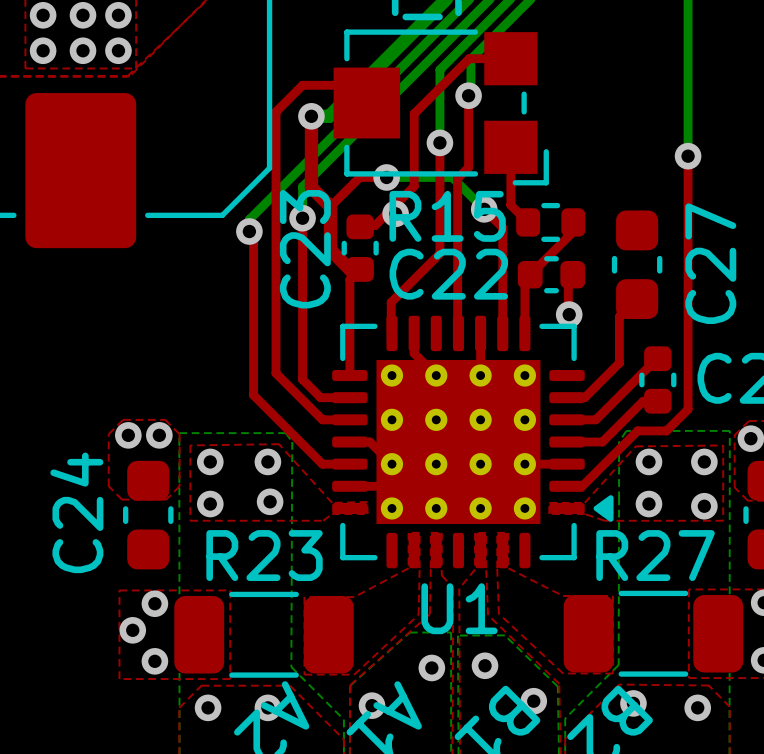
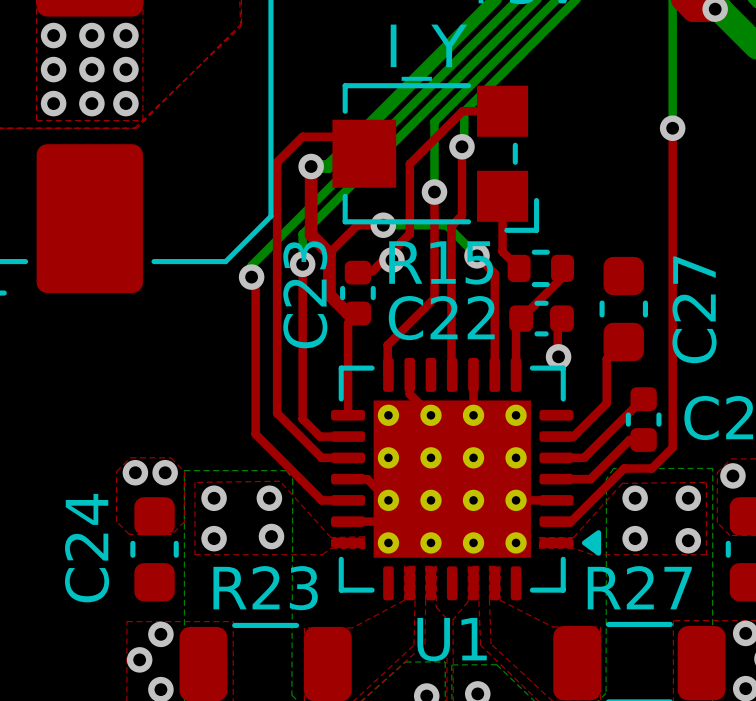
top track: none -> (672, 128) (672, 204)
bottom track: (688, 76) (688, 156) -> none
via position: (688, 156) -> (672, 128)

